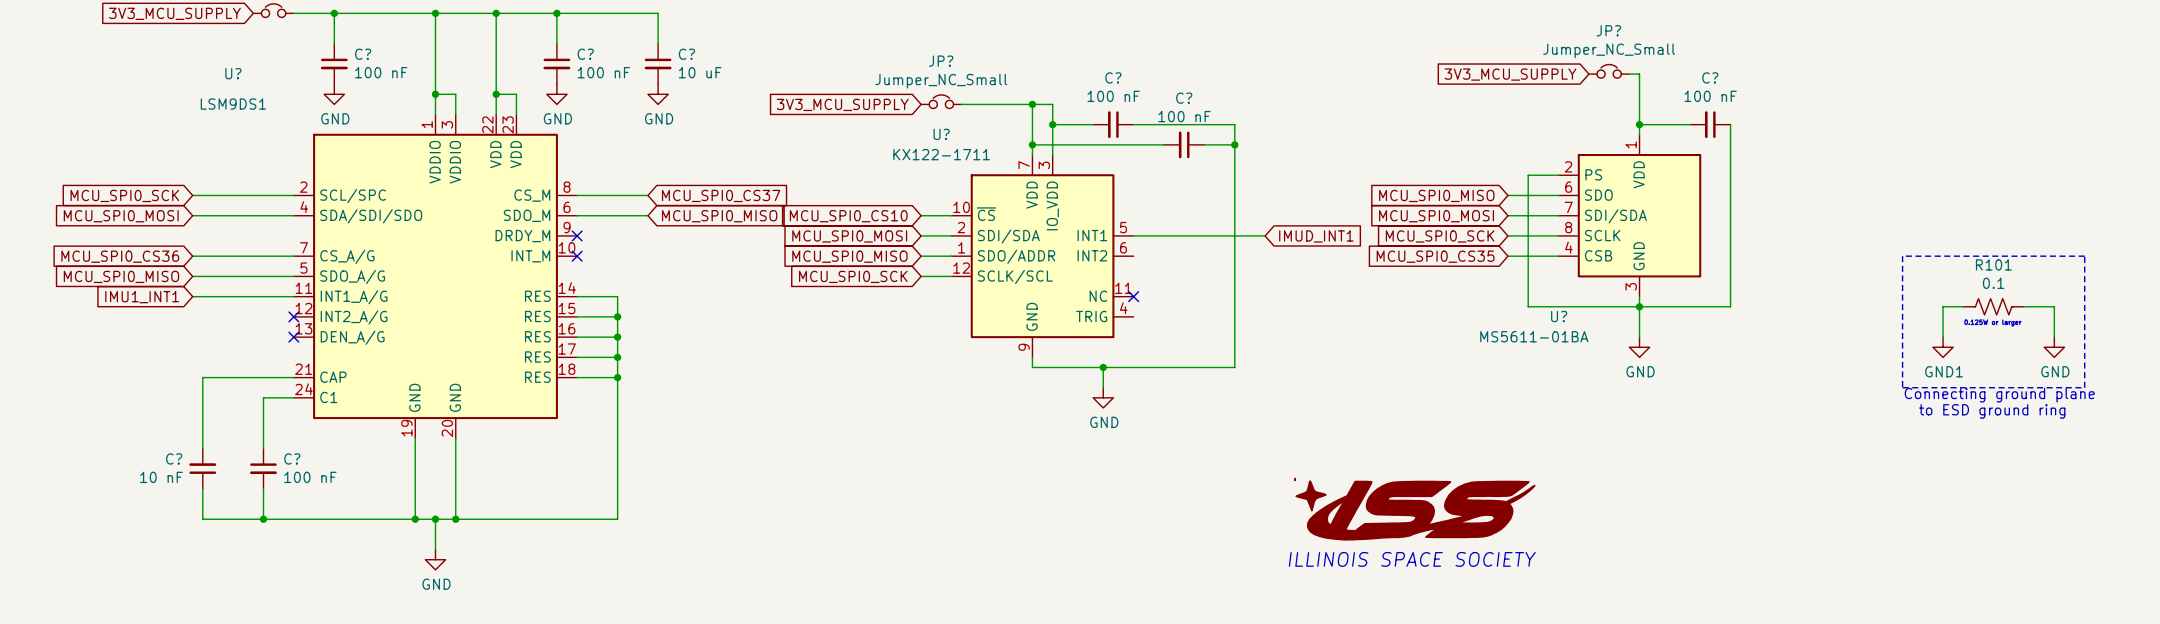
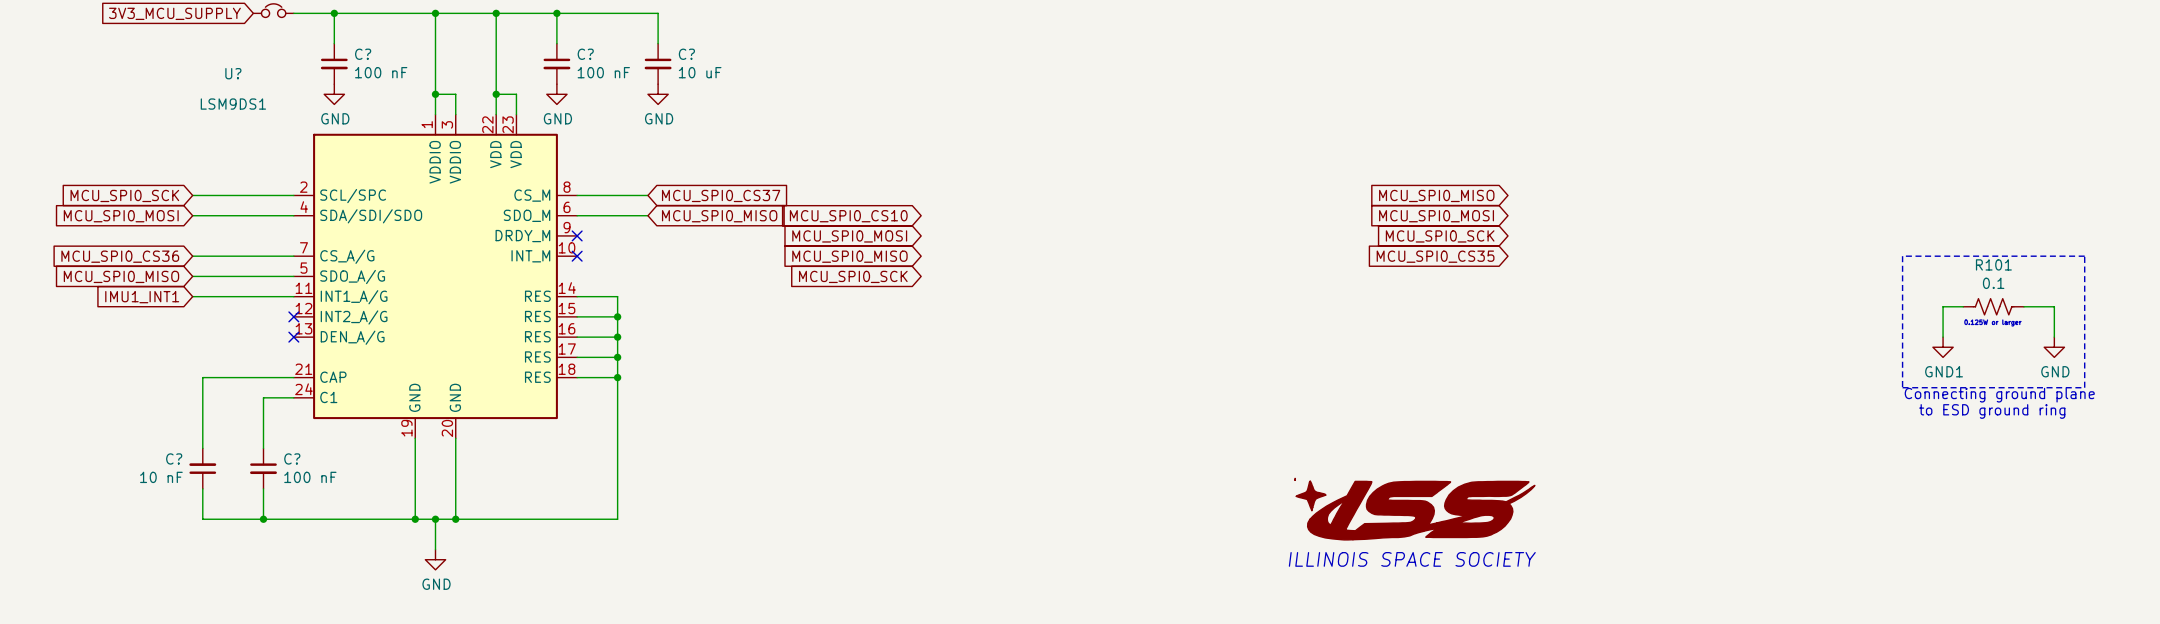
JP?: Jumper_NC_Small (1609, 71) -> none
global label: 3V3_MCU_SUPPLY (1510, 74) -> none
wire: (1629, 74) (1639, 74) (1639, 134) -> none
JP?: Jumper_NC_Small (941, 101) -> none
global label: 3V3_MCU_SUPPLY (842, 104) -> none
wire: (961, 104) (1052, 104) (1052, 155) -> none
wire: (1032, 104) (1032, 155) -> none
junction: (1032, 104) -> none
wire: (1052, 124) (1093, 124) -> none
junction: (1052, 124) -> none
C?: 100 nF (1113, 124) -> none
wire: (1133, 124) (1234, 124) (1234, 367) (1032, 367) (1032, 357) -> none
wire: (1639, 124) (1690, 124) -> none
junction: (1639, 124) -> none
C?: 100 nF (1710, 124) -> none
wire: (1730, 124) (1730, 306) (1528, 306) (1528, 175) (1558, 175) -> none
wire: (1032, 144) (1163, 144) -> none
junction: (1032, 144) -> none
C?: 100 nF (1184, 144) -> none
wire: (1204, 144) (1234, 144) -> none
junction: (1234, 144) -> none
wire: (1507, 195) (1558, 195) -> none
wire: (921, 215) (951, 215) -> none
wire: (1507, 215) (1558, 215) -> none
U?: MS5611-01BA (1629, 215) -> none
wire: (921, 235) (951, 235) -> none
wire: (1133, 235) (1265, 235) -> none
wire: (1507, 235) (1558, 235) -> none
global label: IMUD_INT1 (1316, 236) -> none
wire: (921, 256) (951, 256) -> none
U?: KX122-1711 (1042, 256) -> none
wire: (1507, 256) (1558, 256) -> none
wire: (921, 276) (951, 276) -> none
no-connect mark: (1133, 296) -> none
wire: (1639, 296) (1639, 337) -> none
junction: (1639, 306) -> none
power symbol: GND (1639, 347) -> none
wire: (1103, 367) (1103, 387) -> none
junction: (1103, 367) -> none
power symbol: GND (1103, 397) -> none

